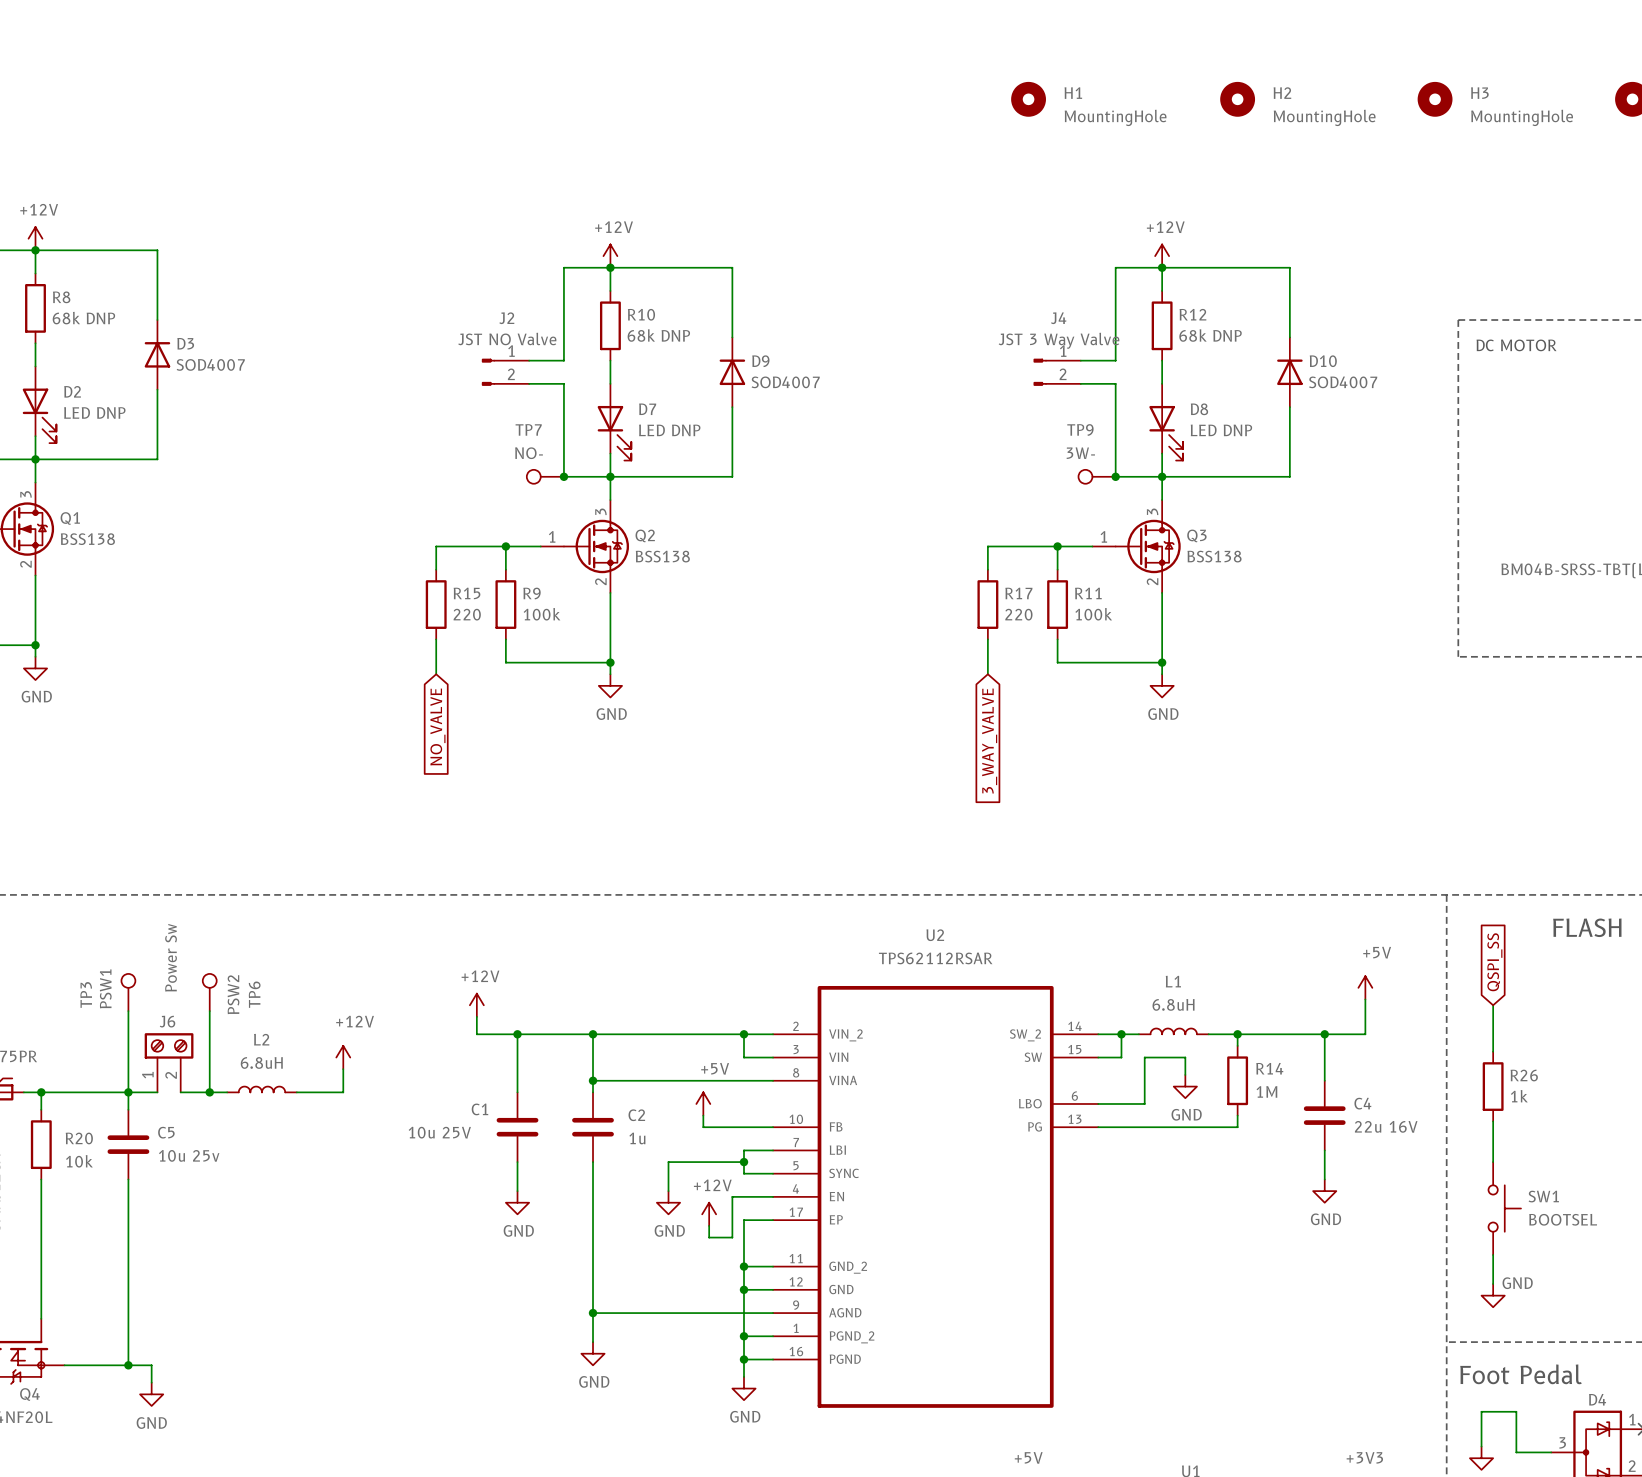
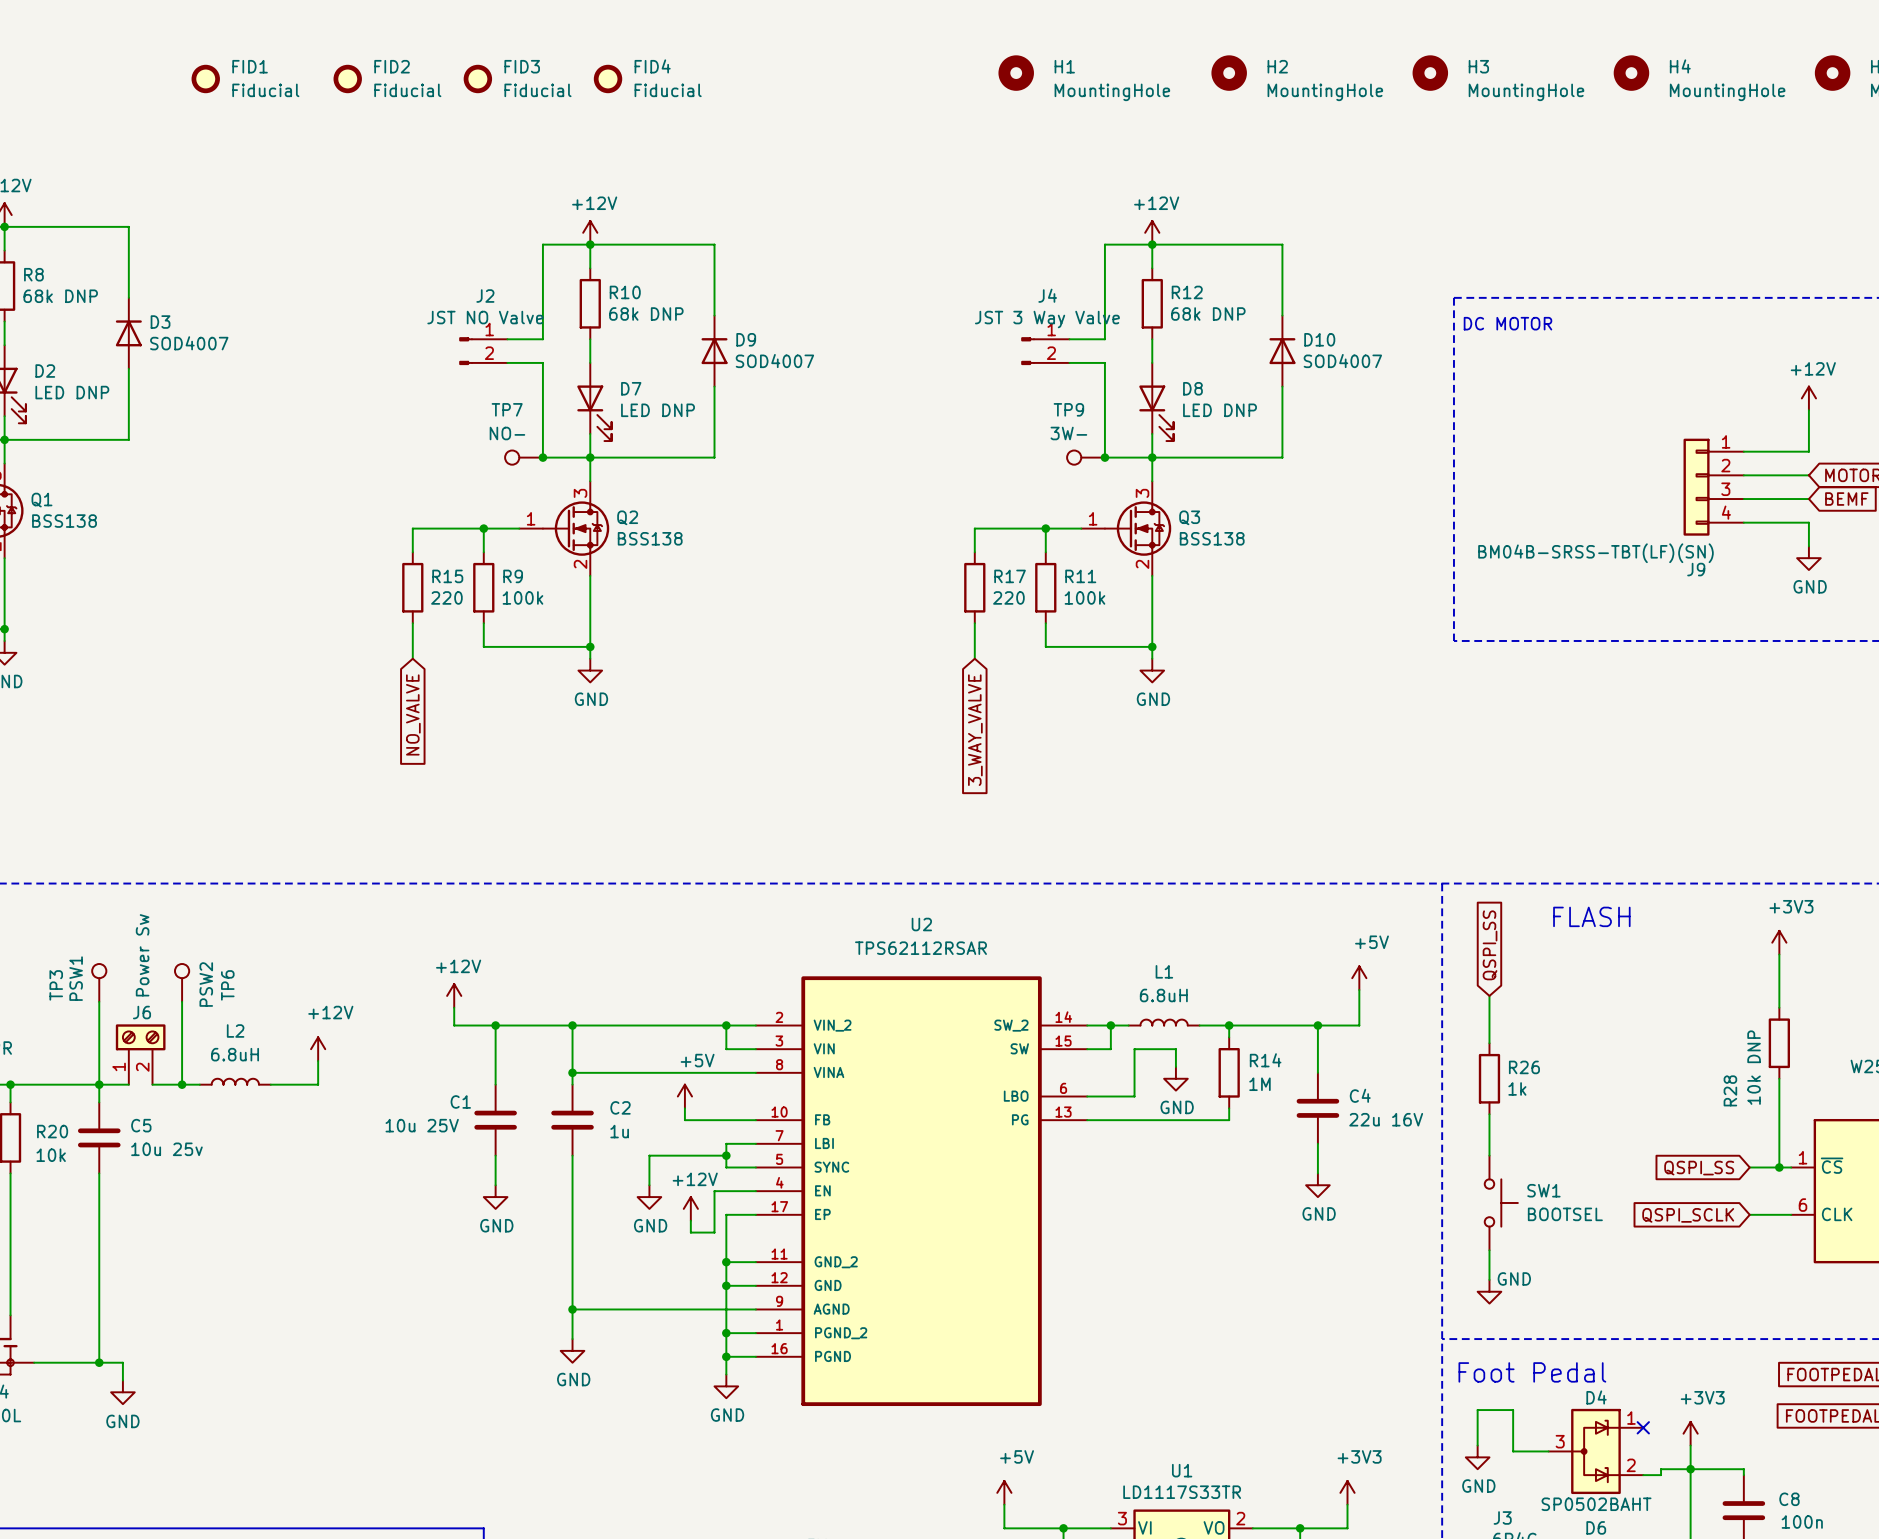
FID1: none -> Fiducial (205, 78)
FID2: none -> Fiducial (347, 78)
FID3: none -> Fiducial (477, 78)
FID4: none -> Fiducial (608, 78)

